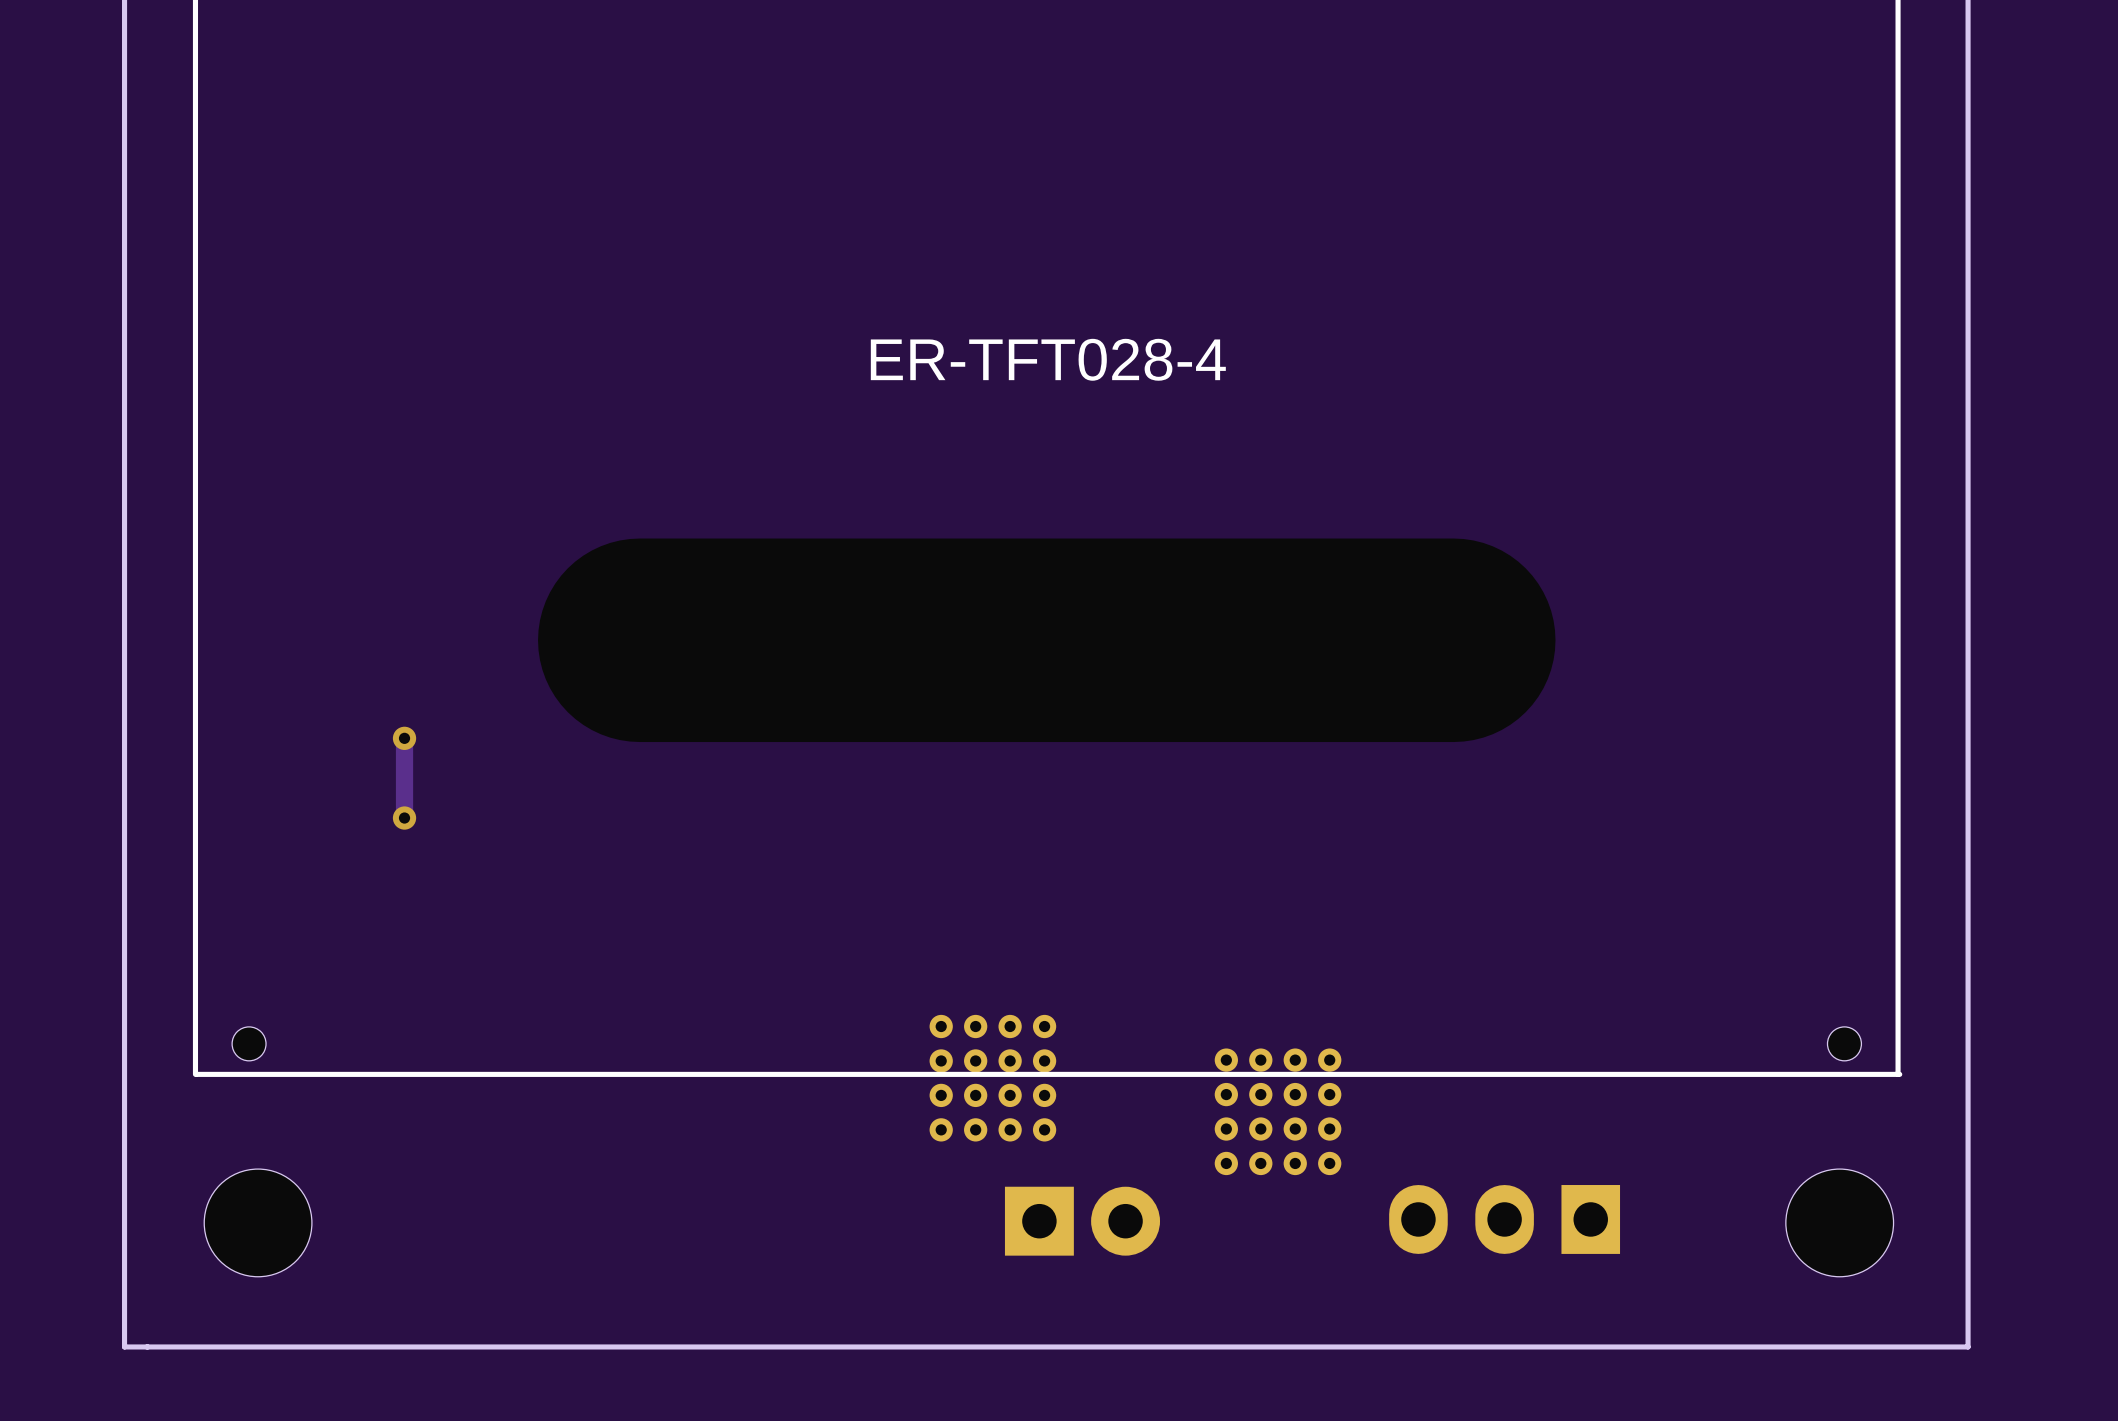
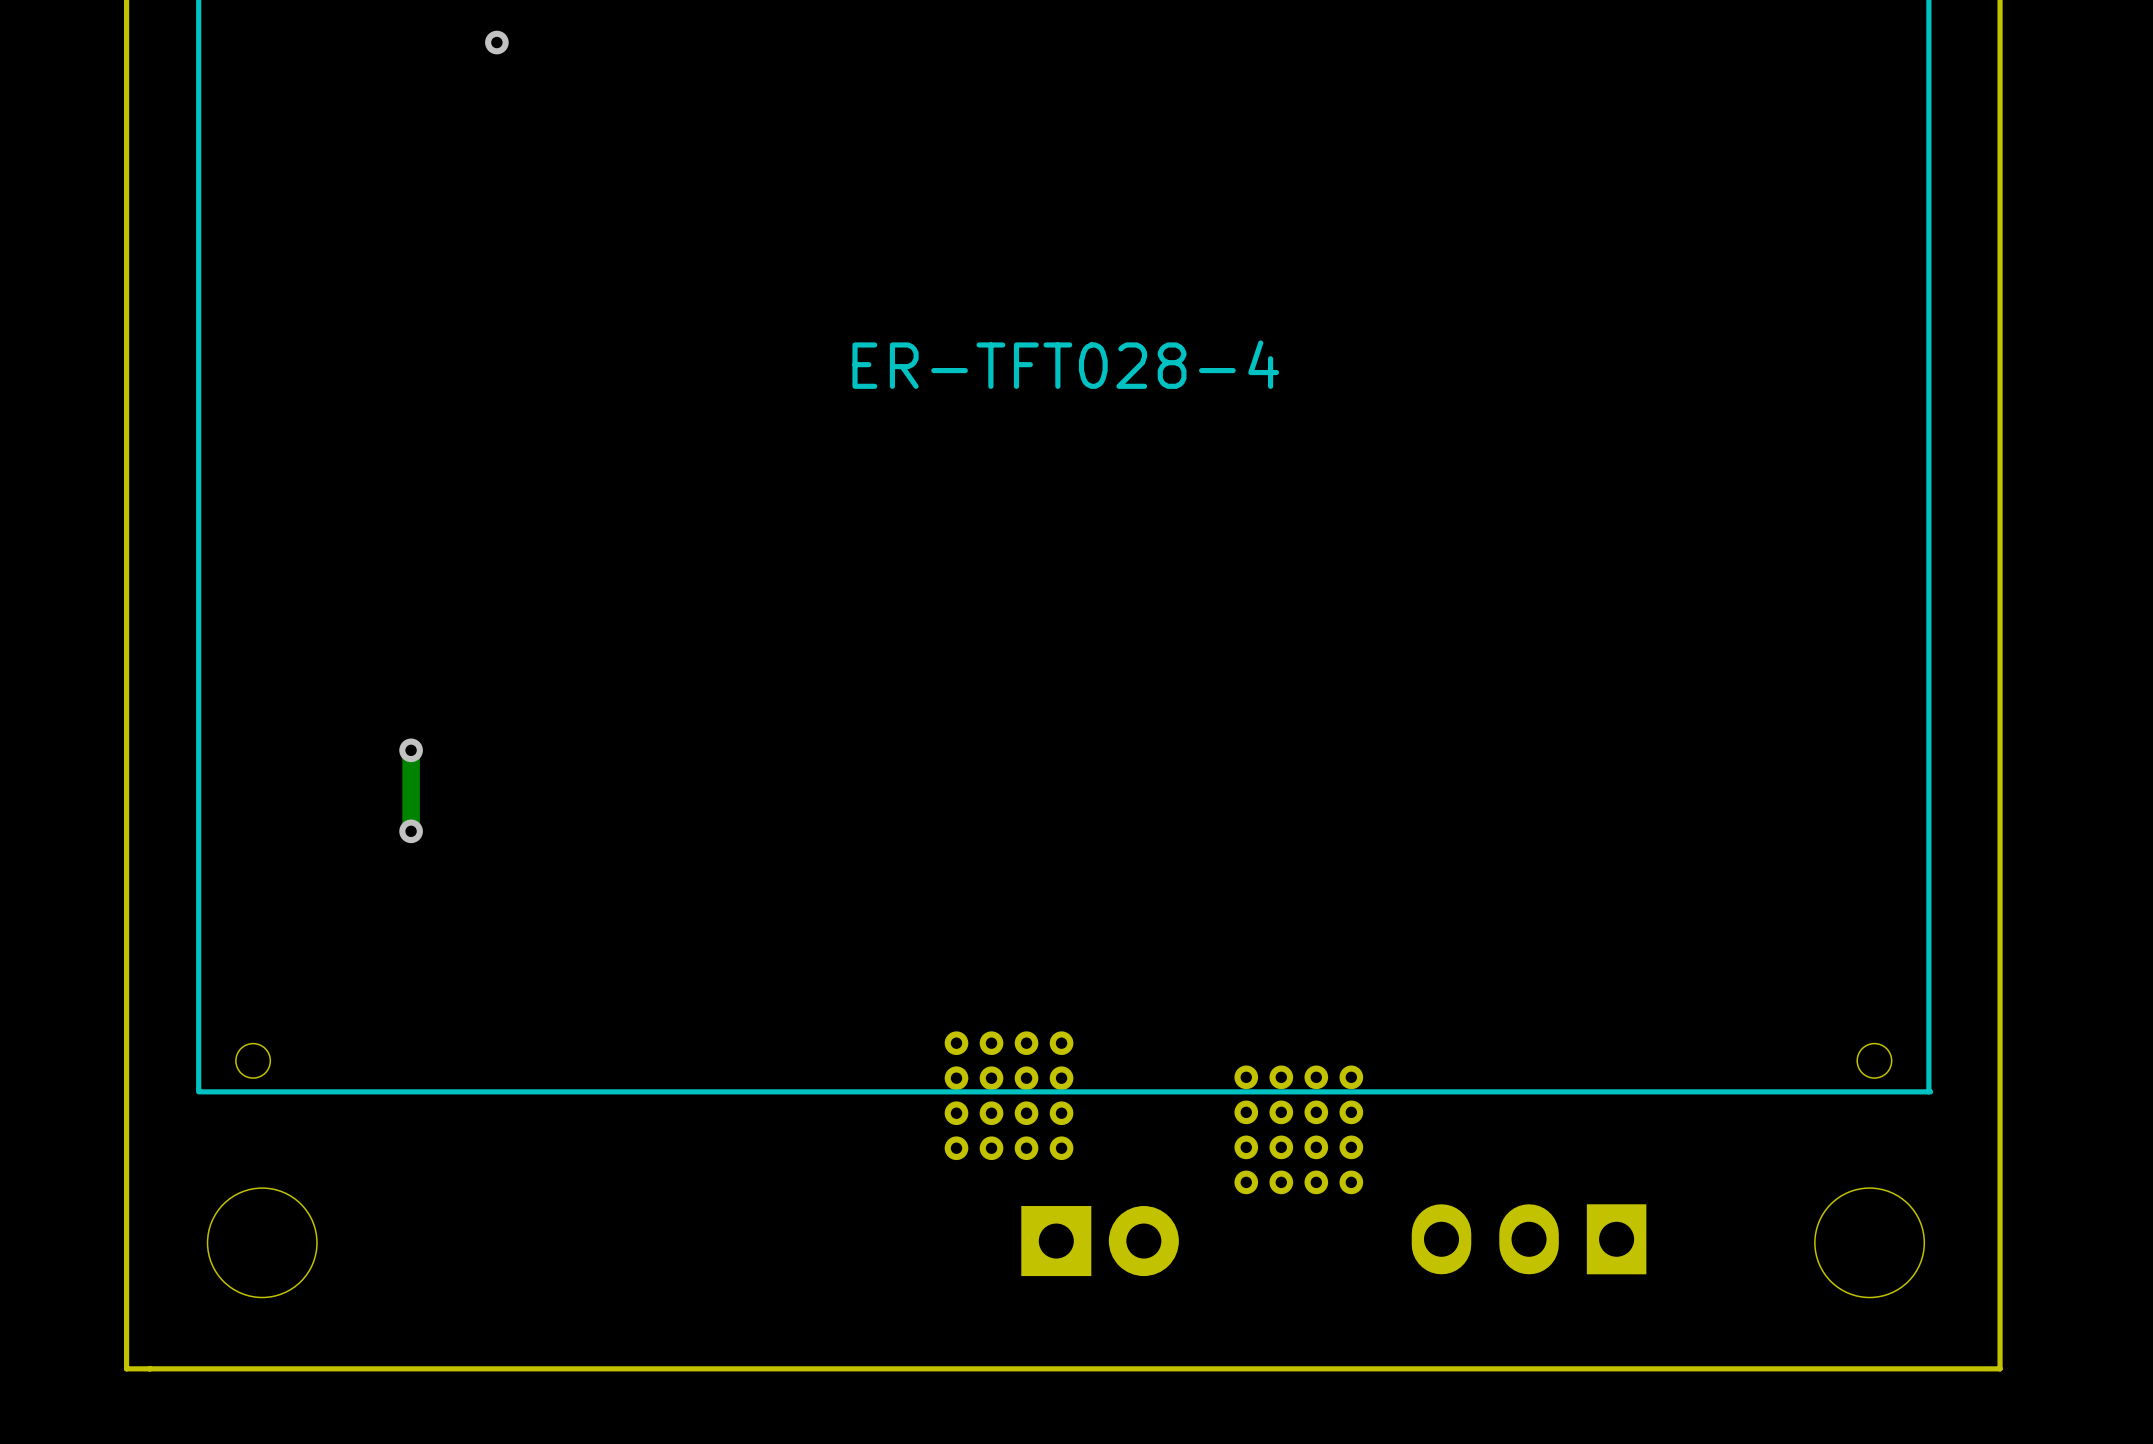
via: none -> (496, 42)

